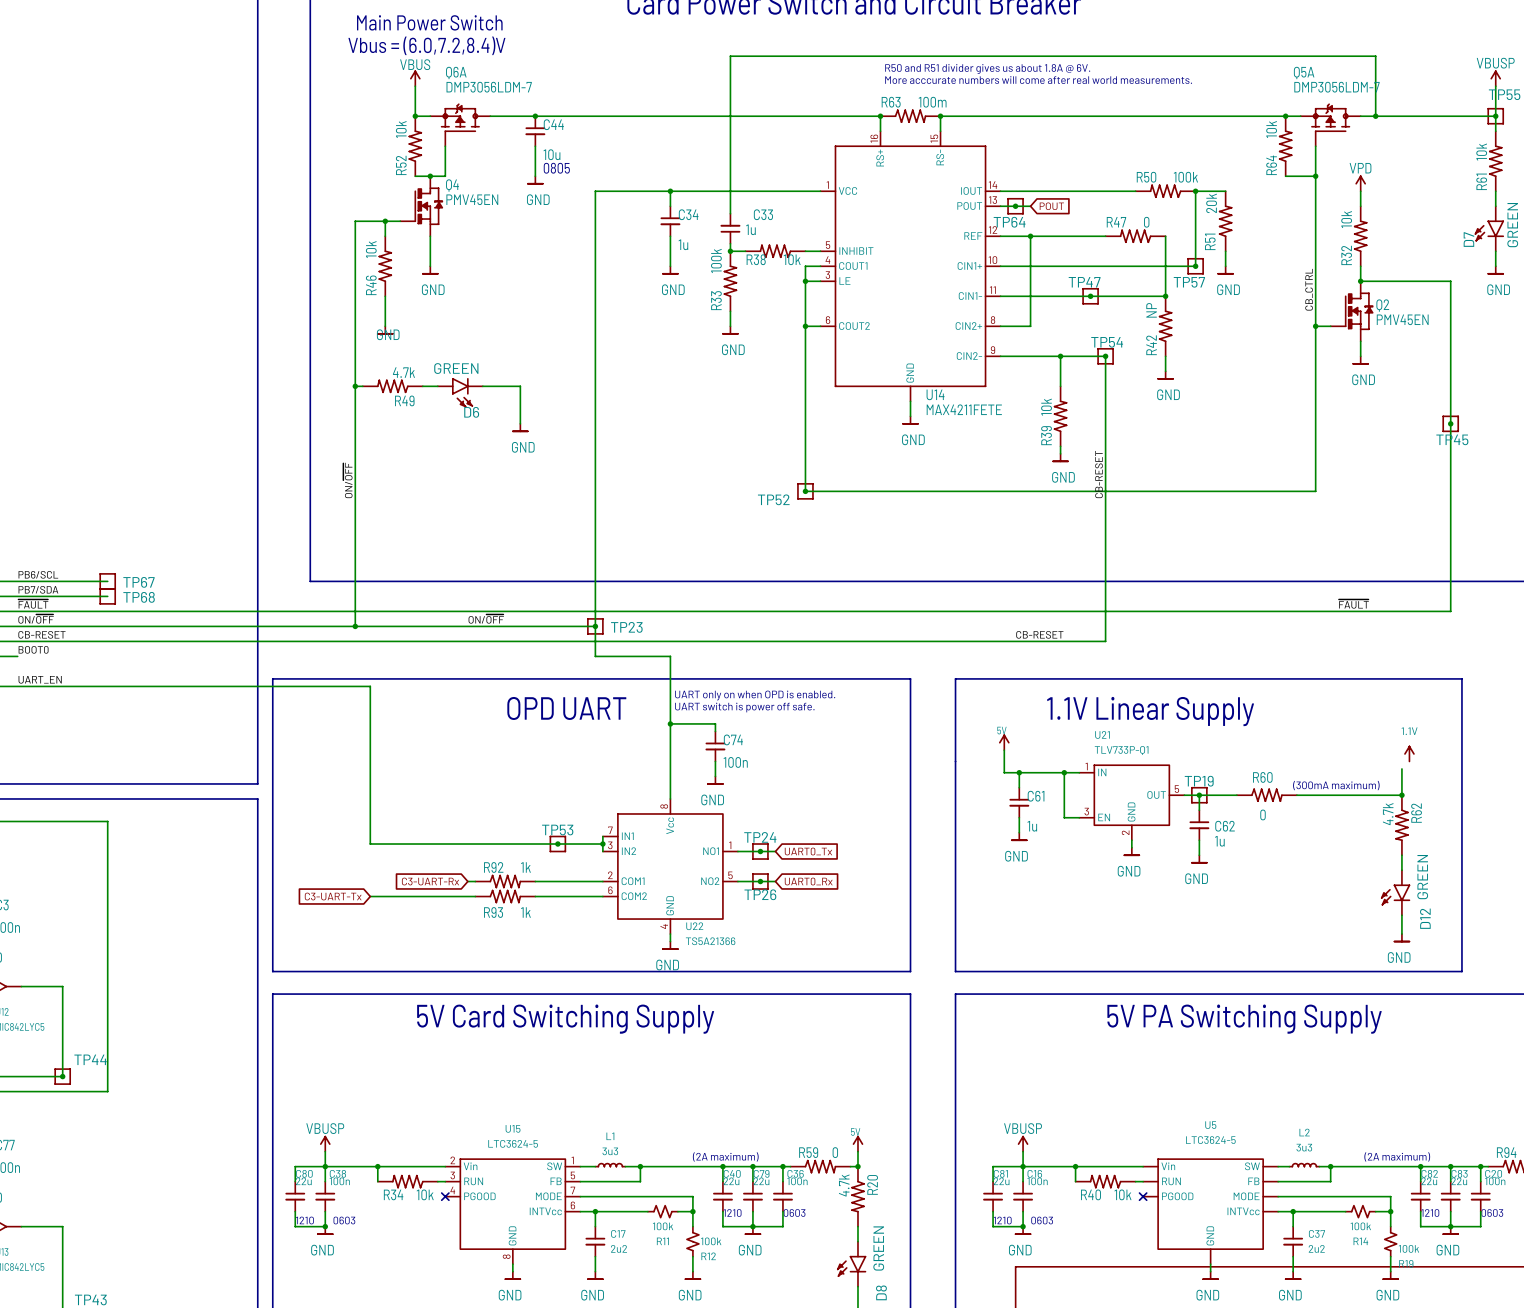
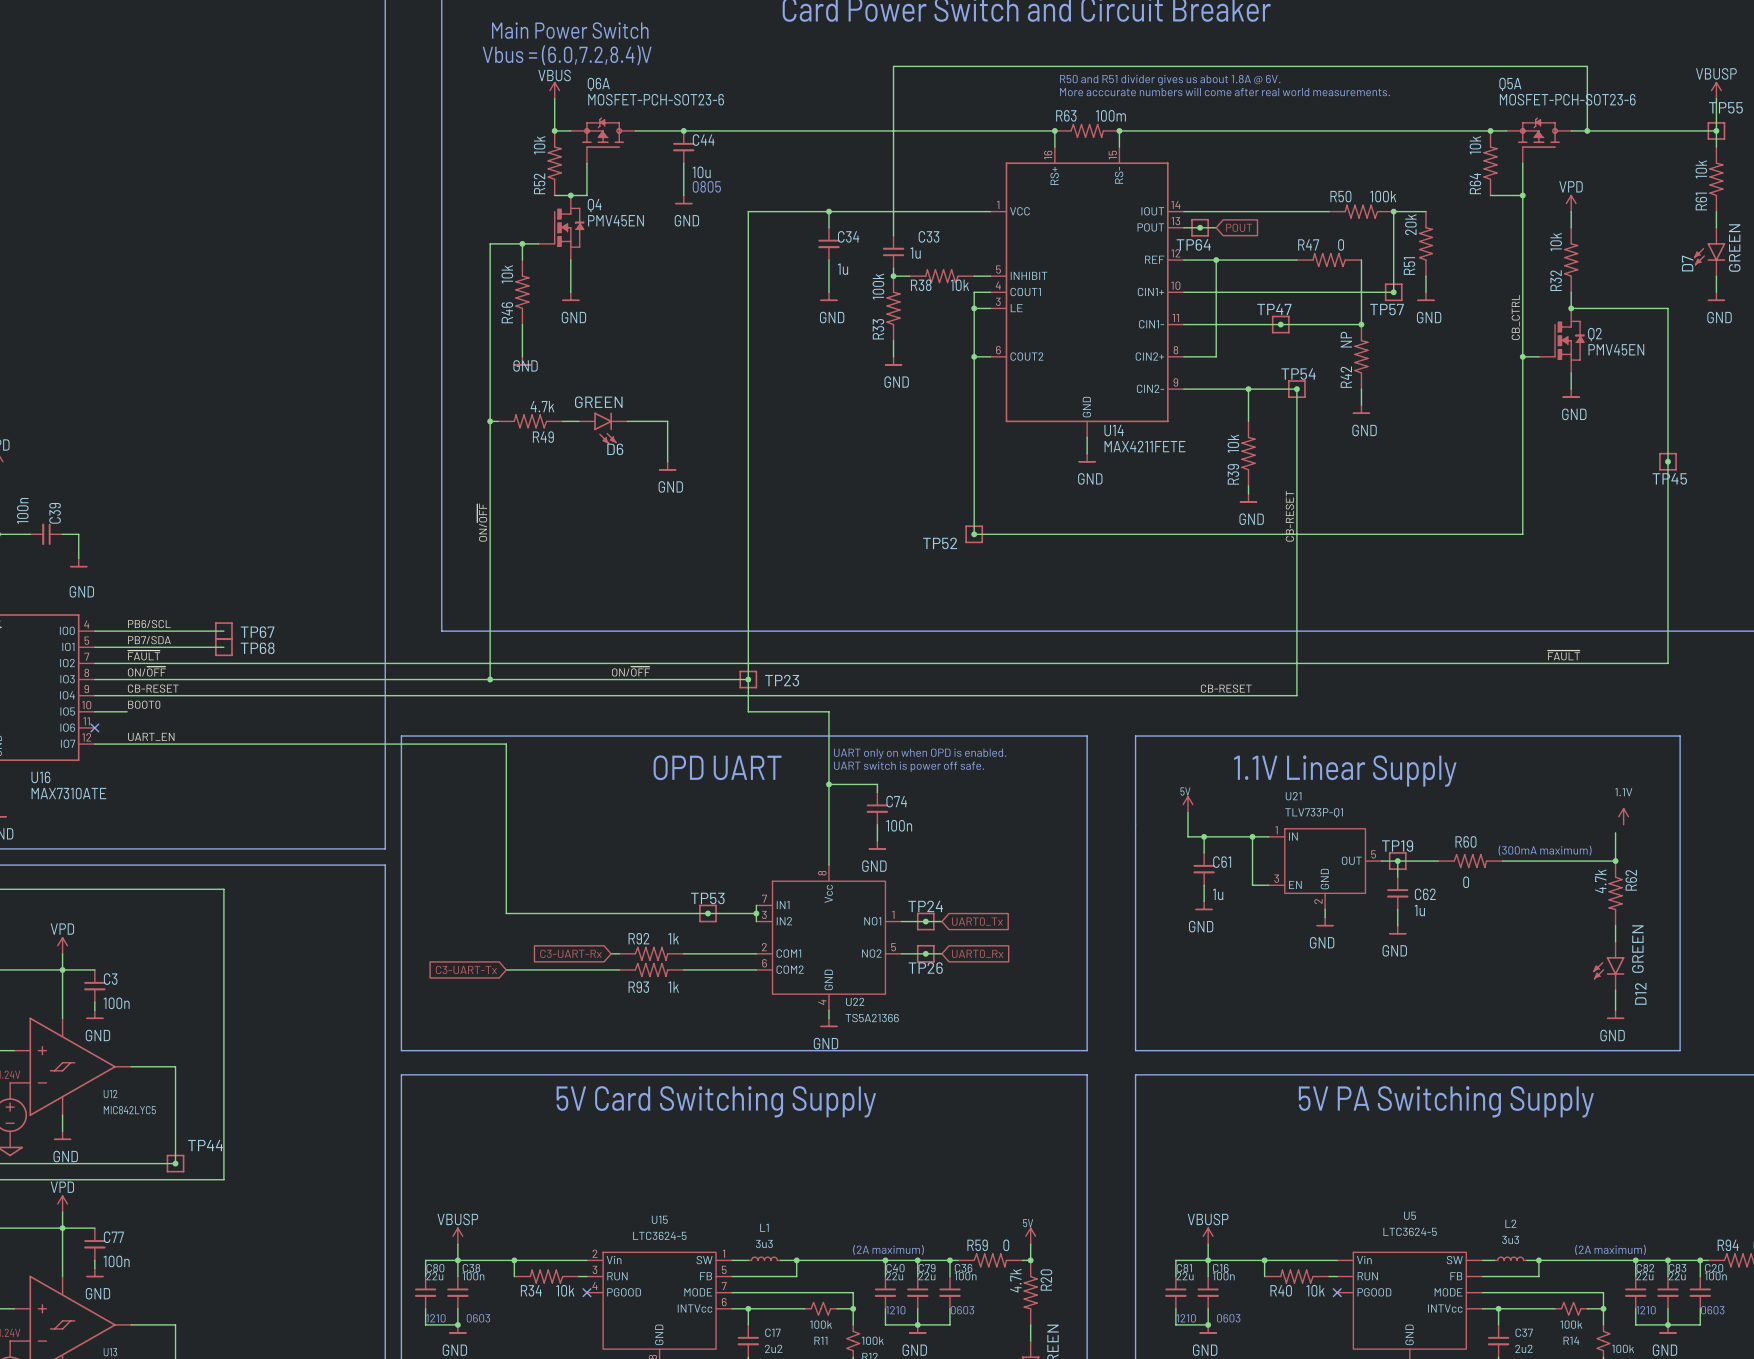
Q6A value: DMP3056LDM-7 (489, 87) -> MOSFET-PCH-SOT23-6 (656, 99)
Q5A value: DMP3056LDM-7 (1336, 87) -> MOSFET-PCH-SOT23-6 (1567, 99)

